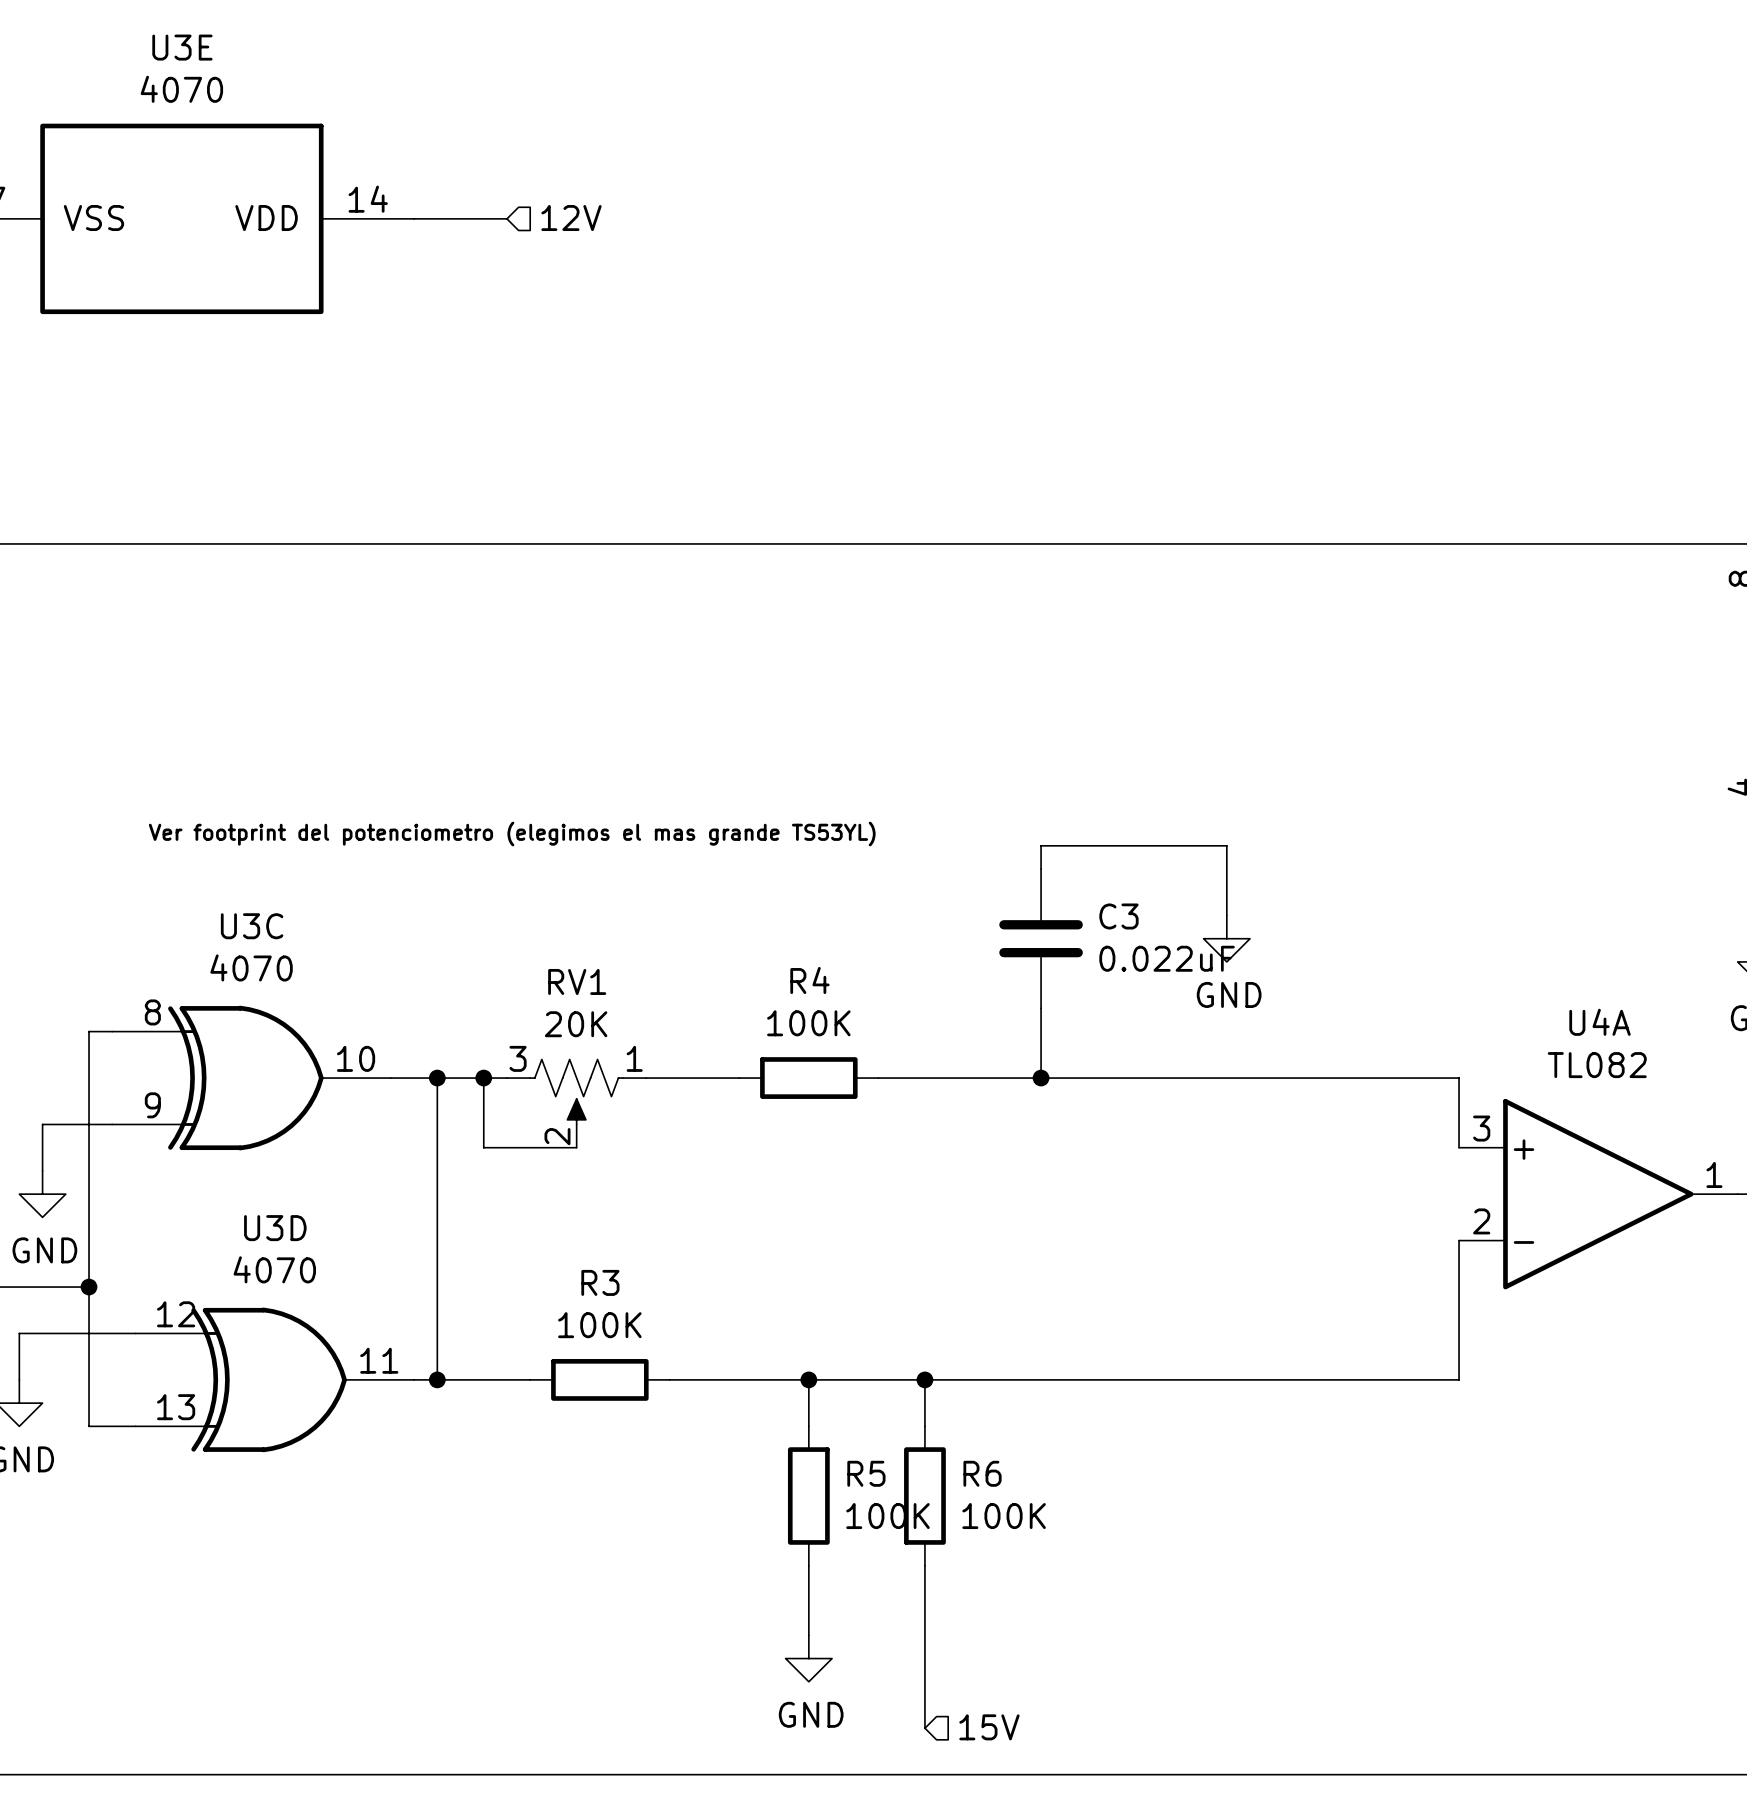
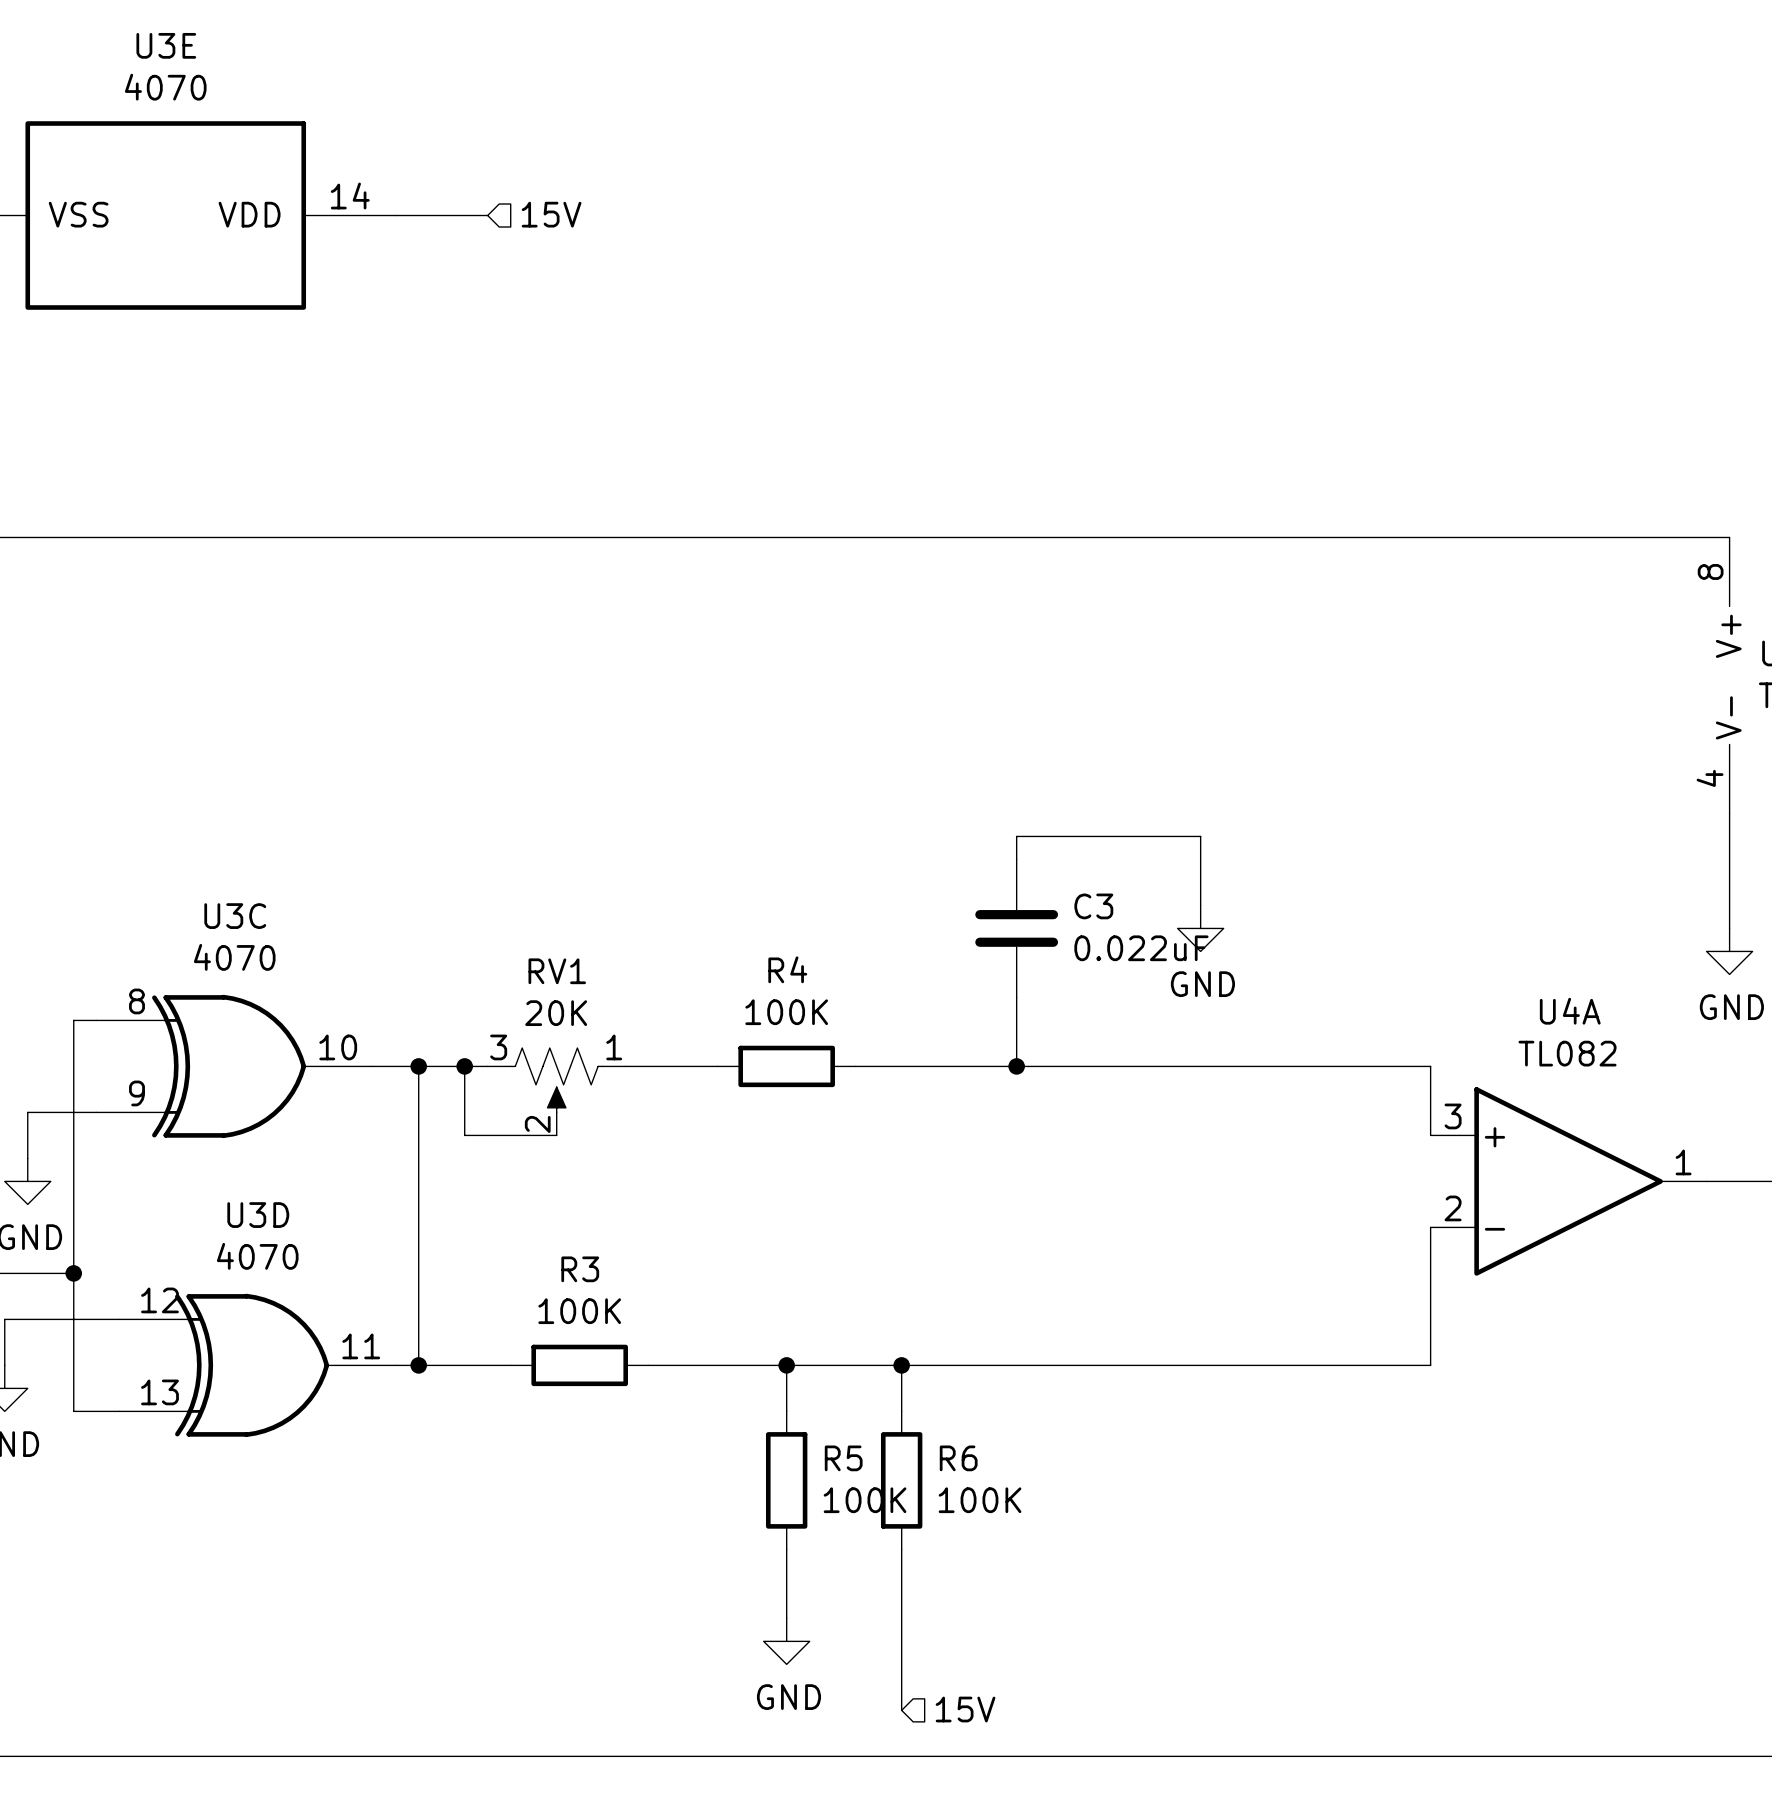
hierarchical label: 12V (571, 218) -> 15V (551, 214)
text: Ver footprint del potenciometro (elegimos el mas grande TS53YL) (512, 834) -> none

